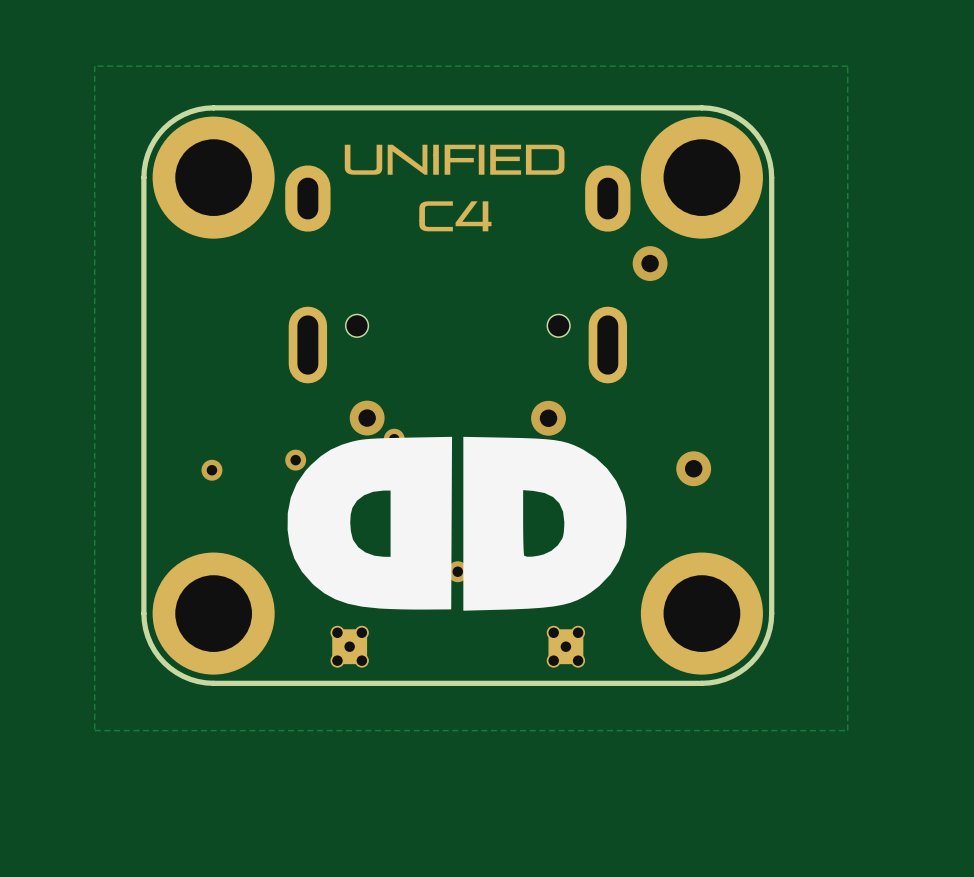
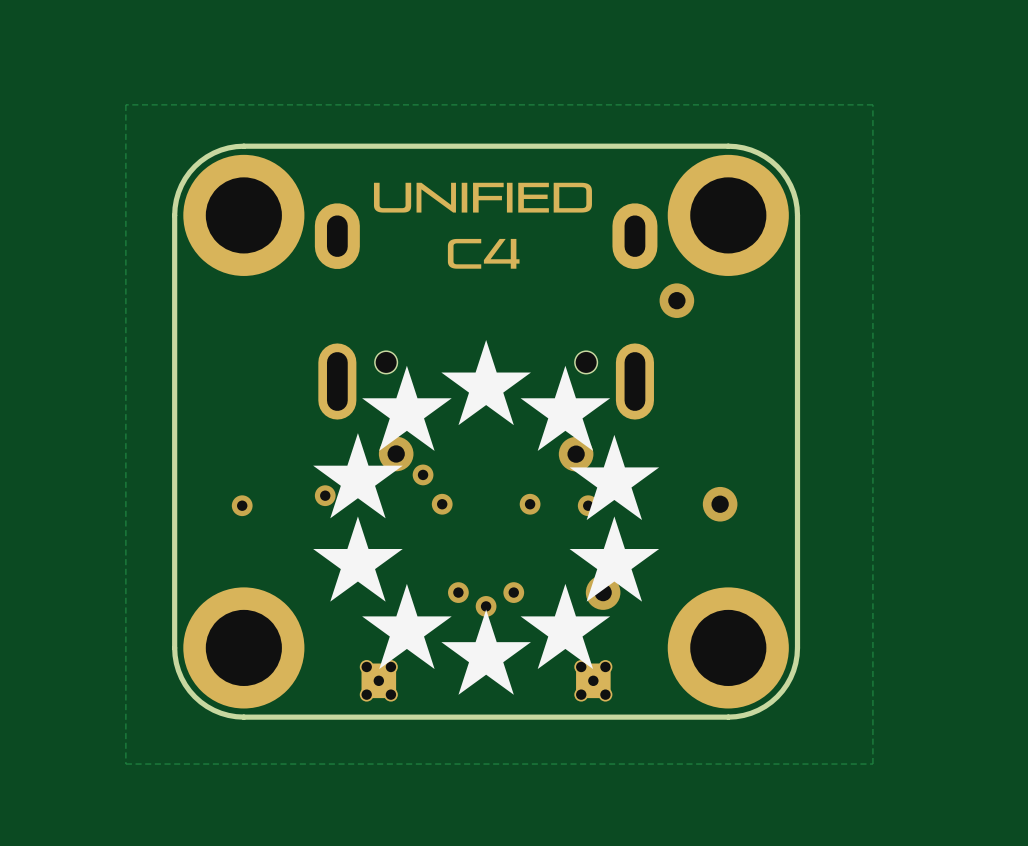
drawing: none -> [313, 339, 660, 695]
drawing: [287, 436, 627, 611] -> none

